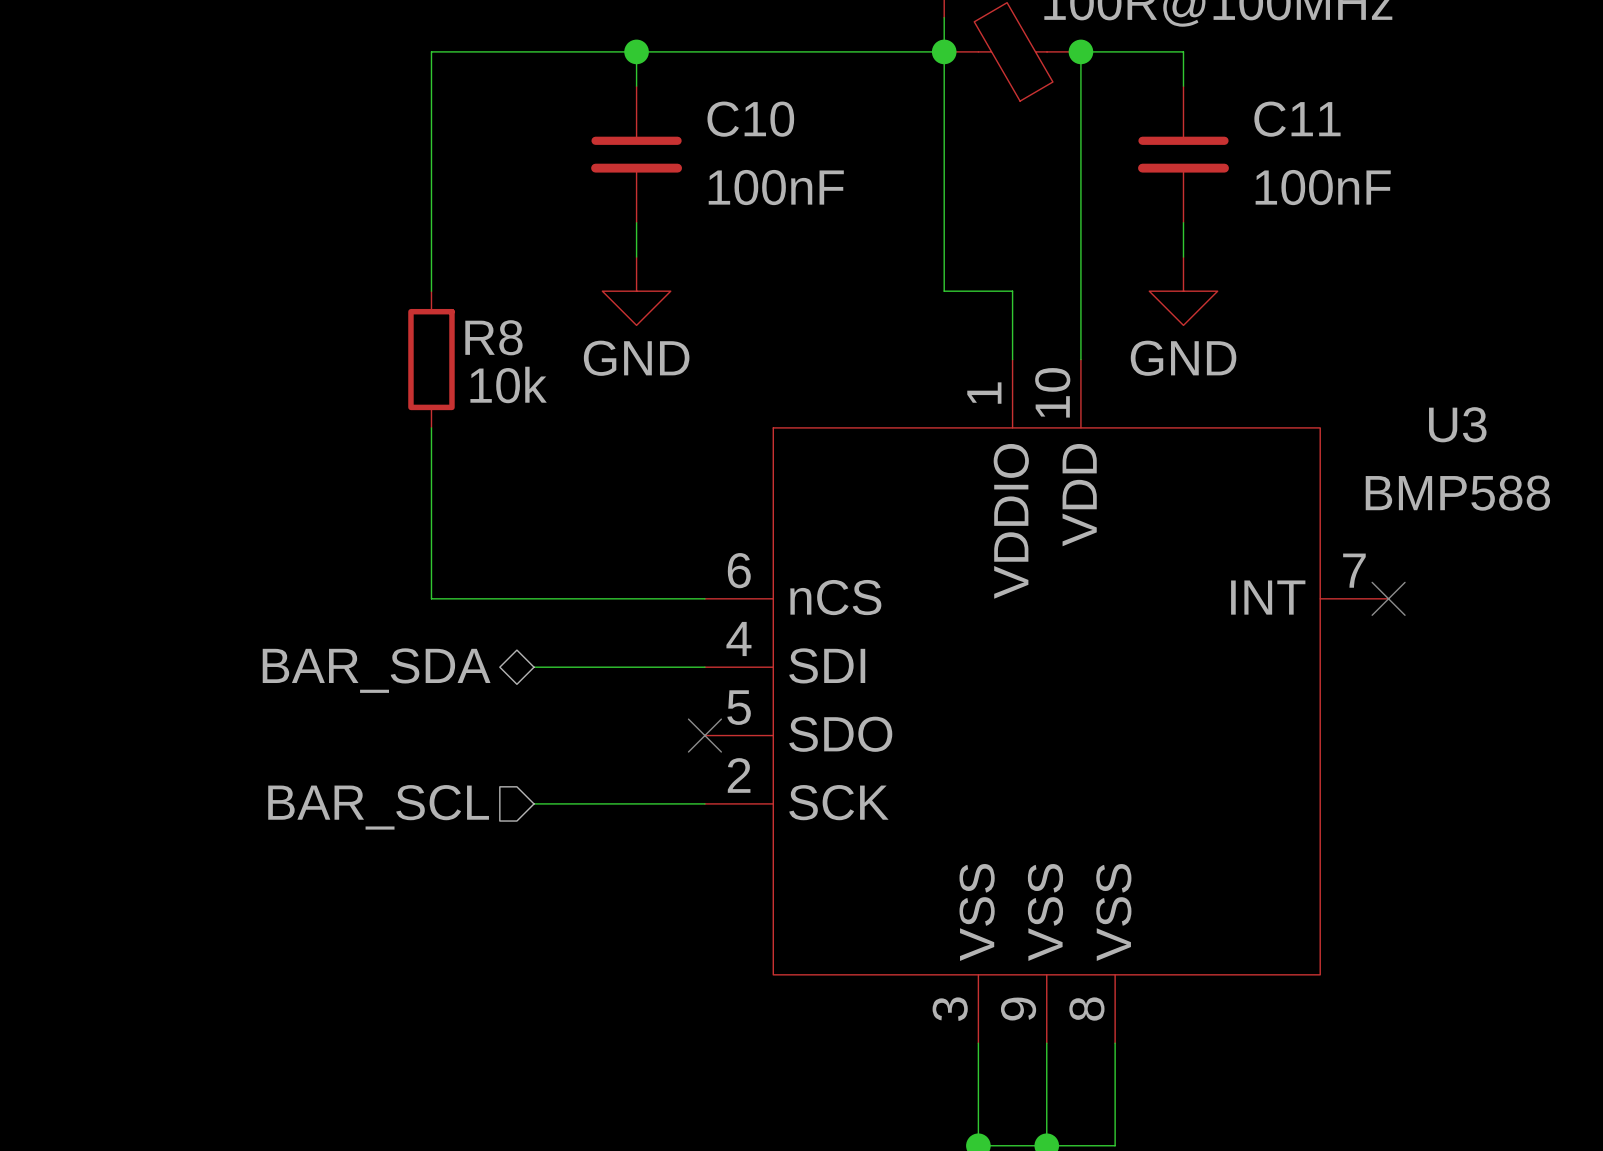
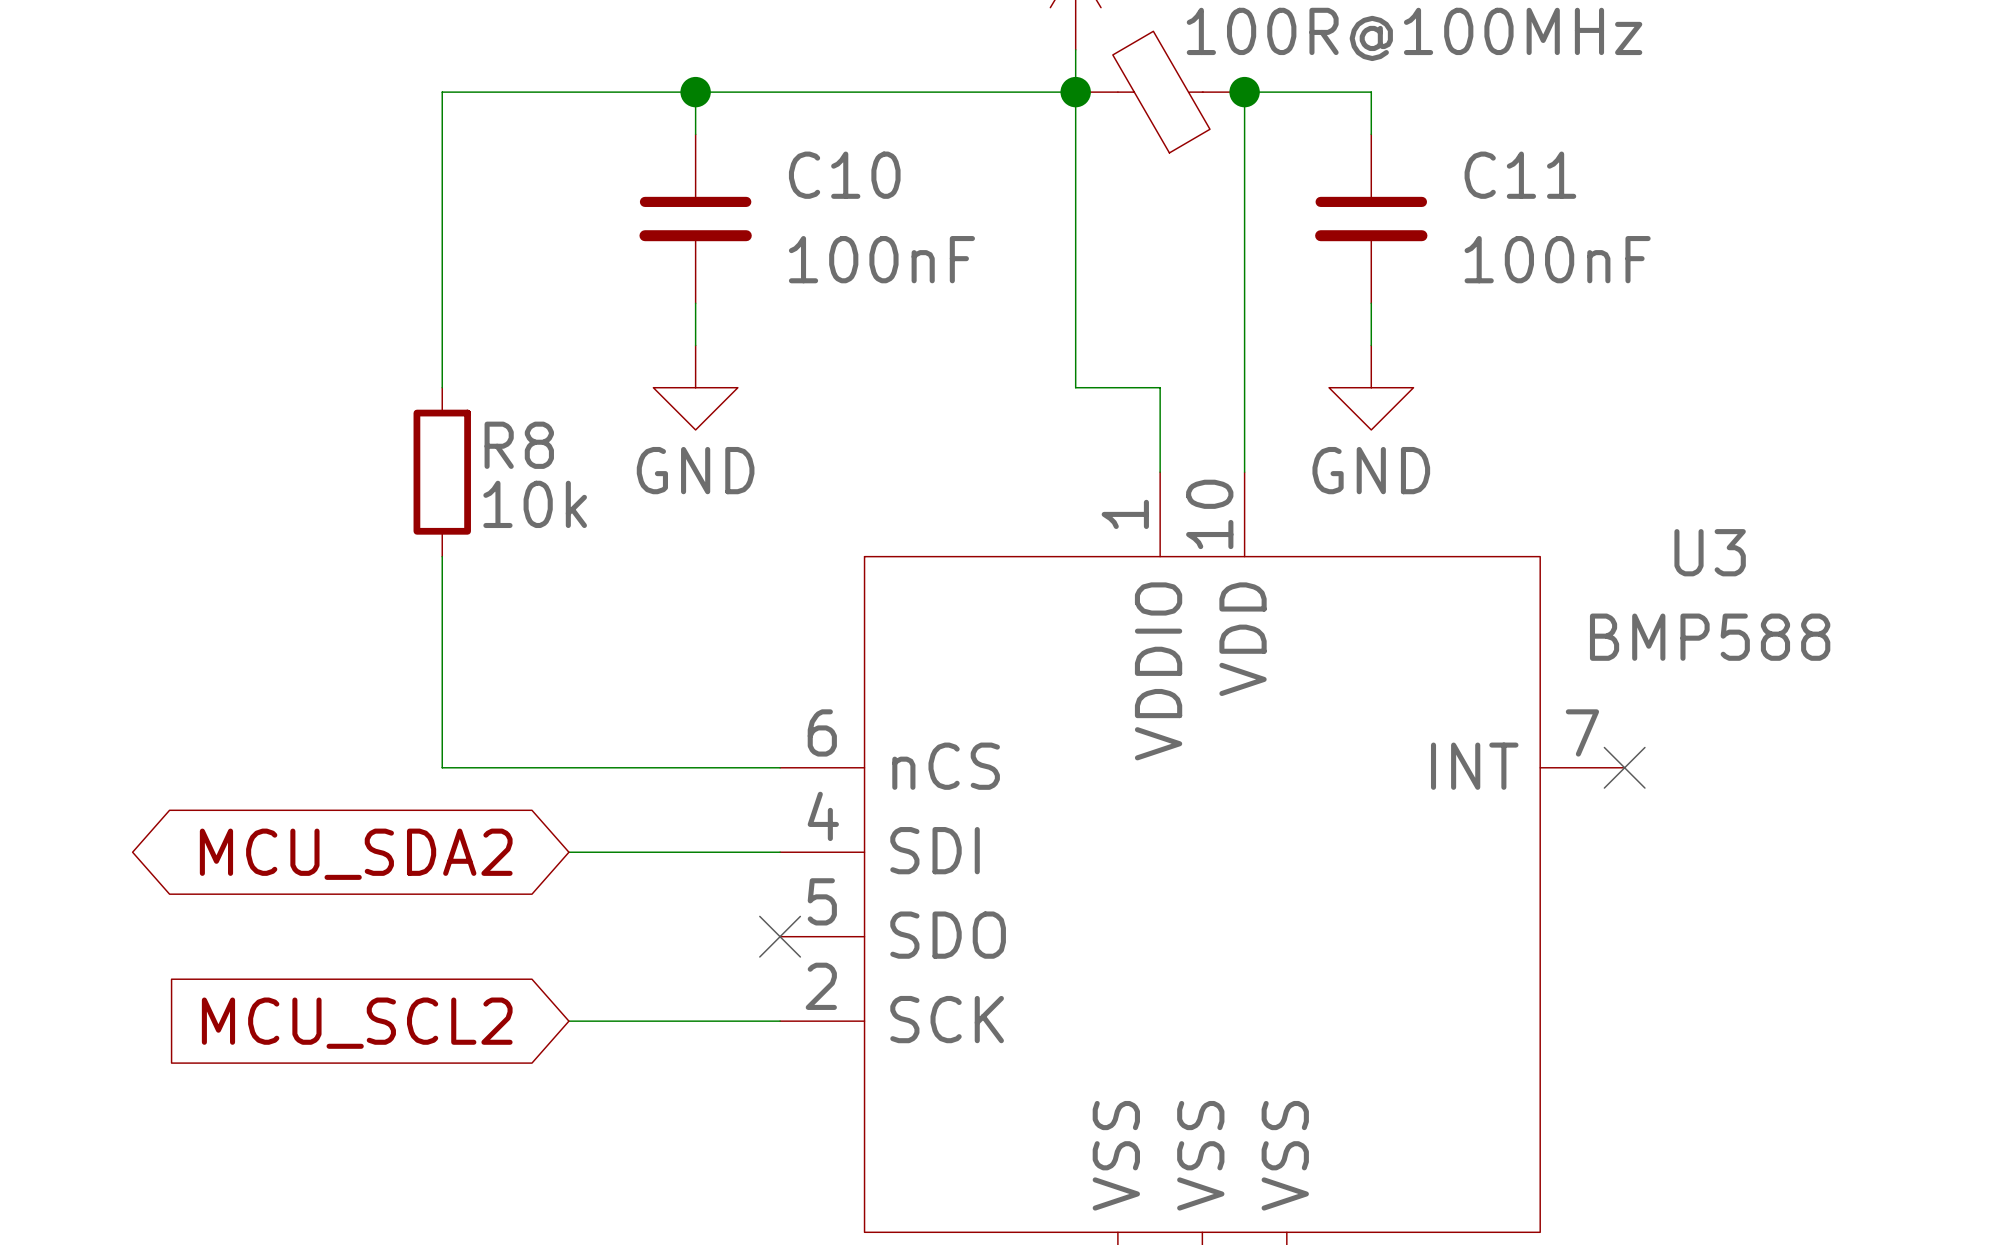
hierarchical label: BAR_SDA (376, 670) -> none
global label: none -> MCU_SDA2 (356, 854)
hierarchical label: BAR_SCL (378, 807) -> none
global label: none -> MCU_SCL2 (357, 1023)

